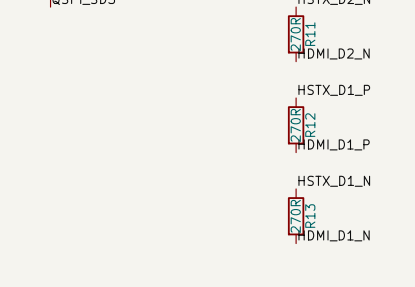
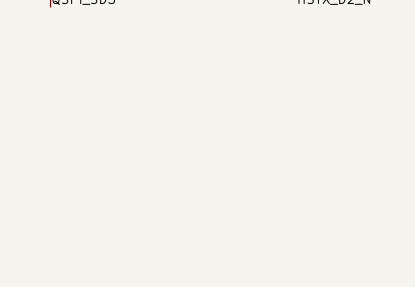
R11: 270R (296, 34) -> none
label: HDMI_D2_N (334, 53) -> none
label: HSTX_D1_P (334, 90) -> none
R12: 270R (296, 125) -> none
label: HDMI_D1_P (334, 144) -> none
label: HSTX_D1_N (334, 181) -> none
R13: 270R (296, 216) -> none
label: HDMI_D1_N (334, 235) -> none

